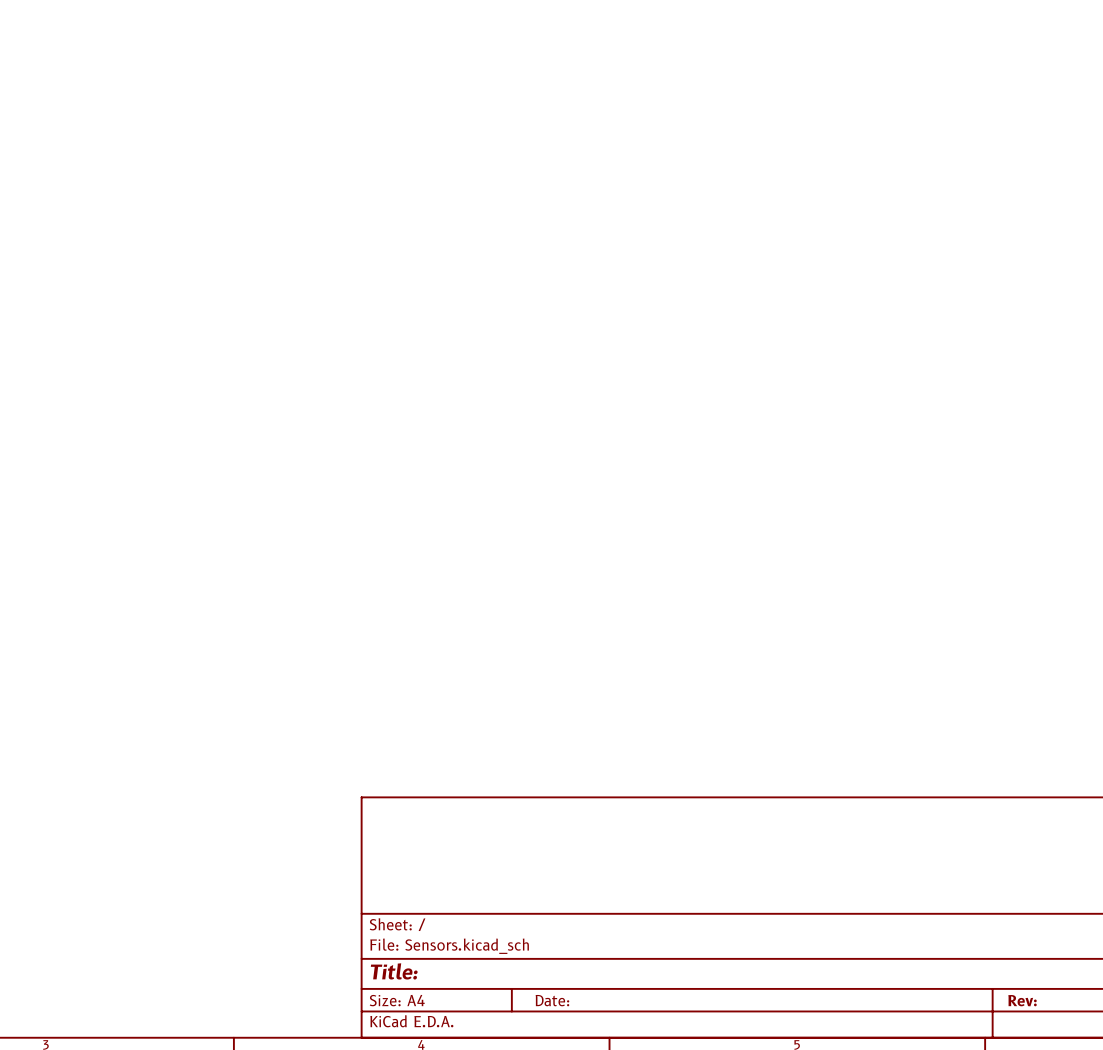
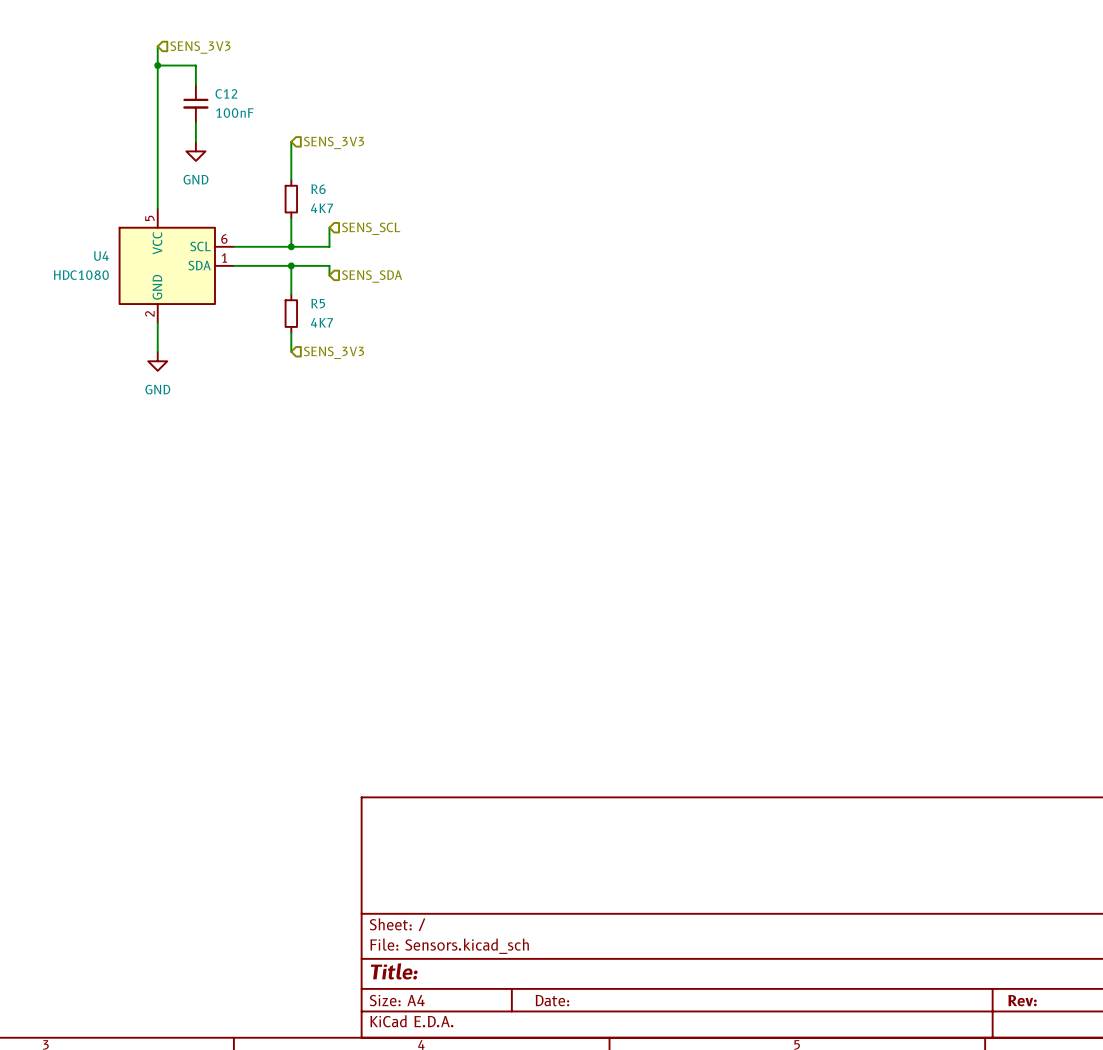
wire: none -> (157, 46) (157, 208)
hierarchical label: none -> SENS_3V3 (200, 47)
wire: none -> (157, 65) (195, 65) (195, 84)
junction: none -> (157, 65)
C12: none -> 100nF (195, 103)
wire: none -> (195, 122) (195, 141)
wire: none -> (291, 141) (291, 180)
hierarchical label: none -> SENS_3V3 (333, 142)
power symbol: none -> GND (195, 151)
R6: none -> 4K7 (291, 199)
wire: none -> (291, 218) (291, 246)
wire: none -> (329, 227) (329, 246) (234, 246)
hierarchical label: none -> SENS_SCL (371, 228)
junction: none -> (291, 246)
U4: none -> HDC1080 (176, 265)
wire: none -> (234, 265) (329, 265) (329, 275)
wire: none -> (291, 265) (291, 294)
junction: none -> (291, 265)
hierarchical label: none -> SENS_SDA (372, 276)
R5: none -> 4K7 (291, 313)
wire: none -> (157, 323) (157, 351)
wire: none -> (291, 332) (291, 351)
hierarchical label: none -> SENS_3V3 (333, 352)
power symbol: none -> GND (157, 361)

